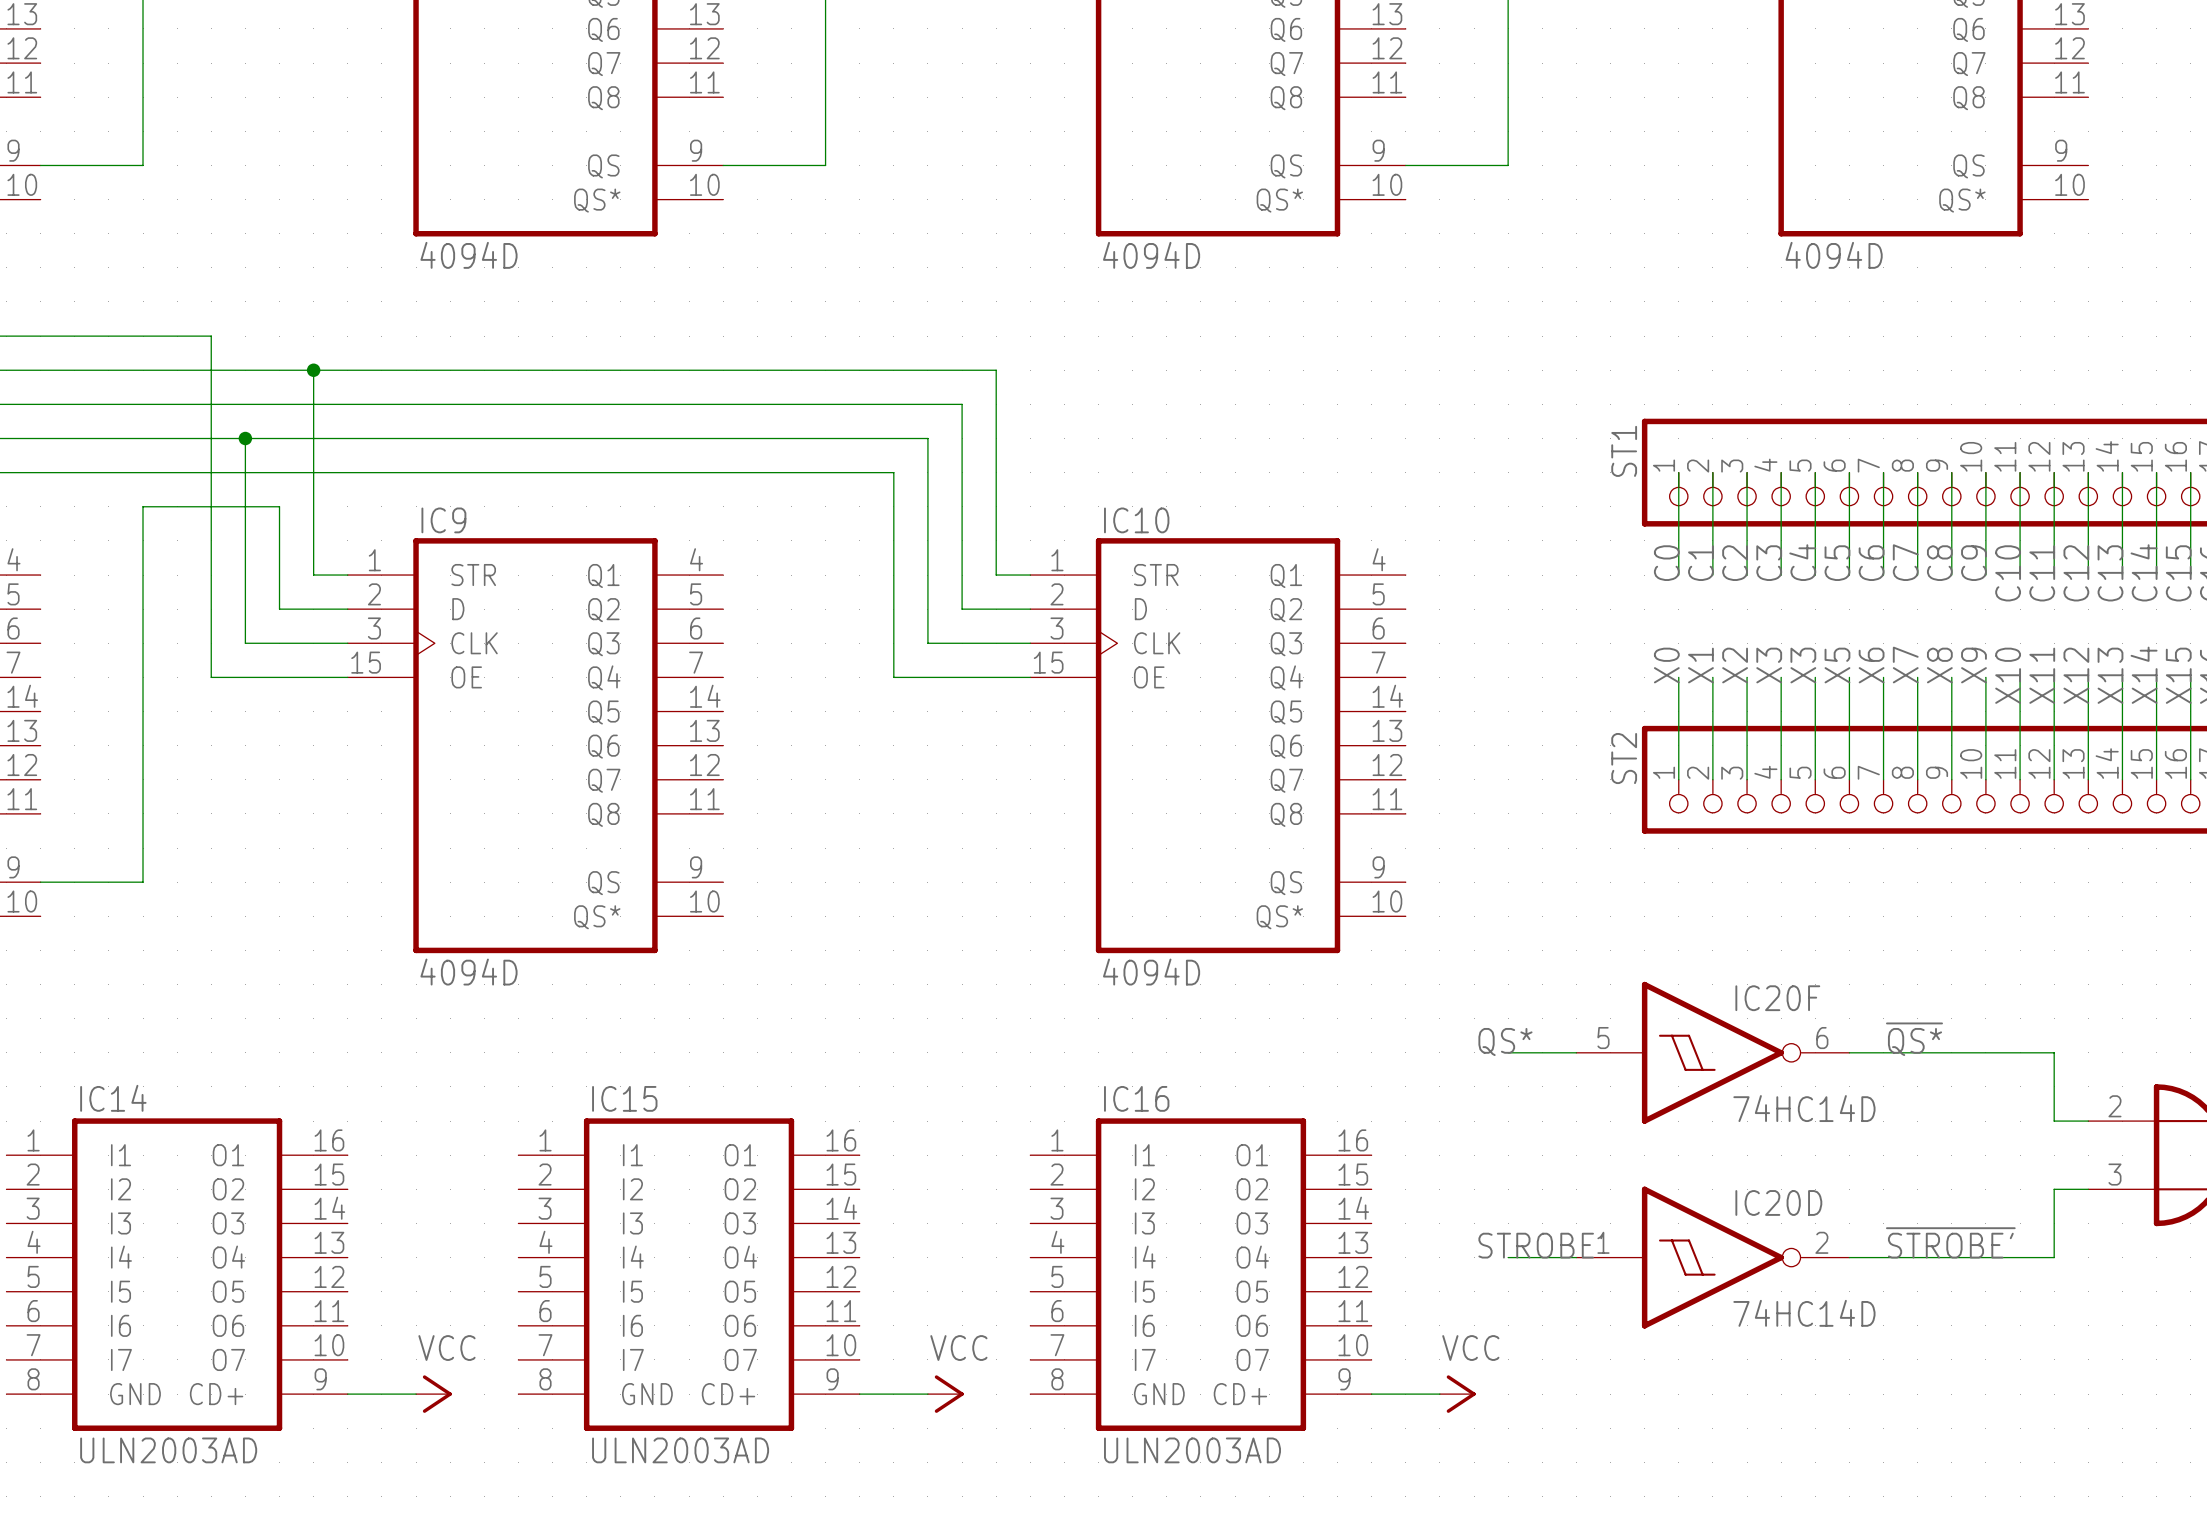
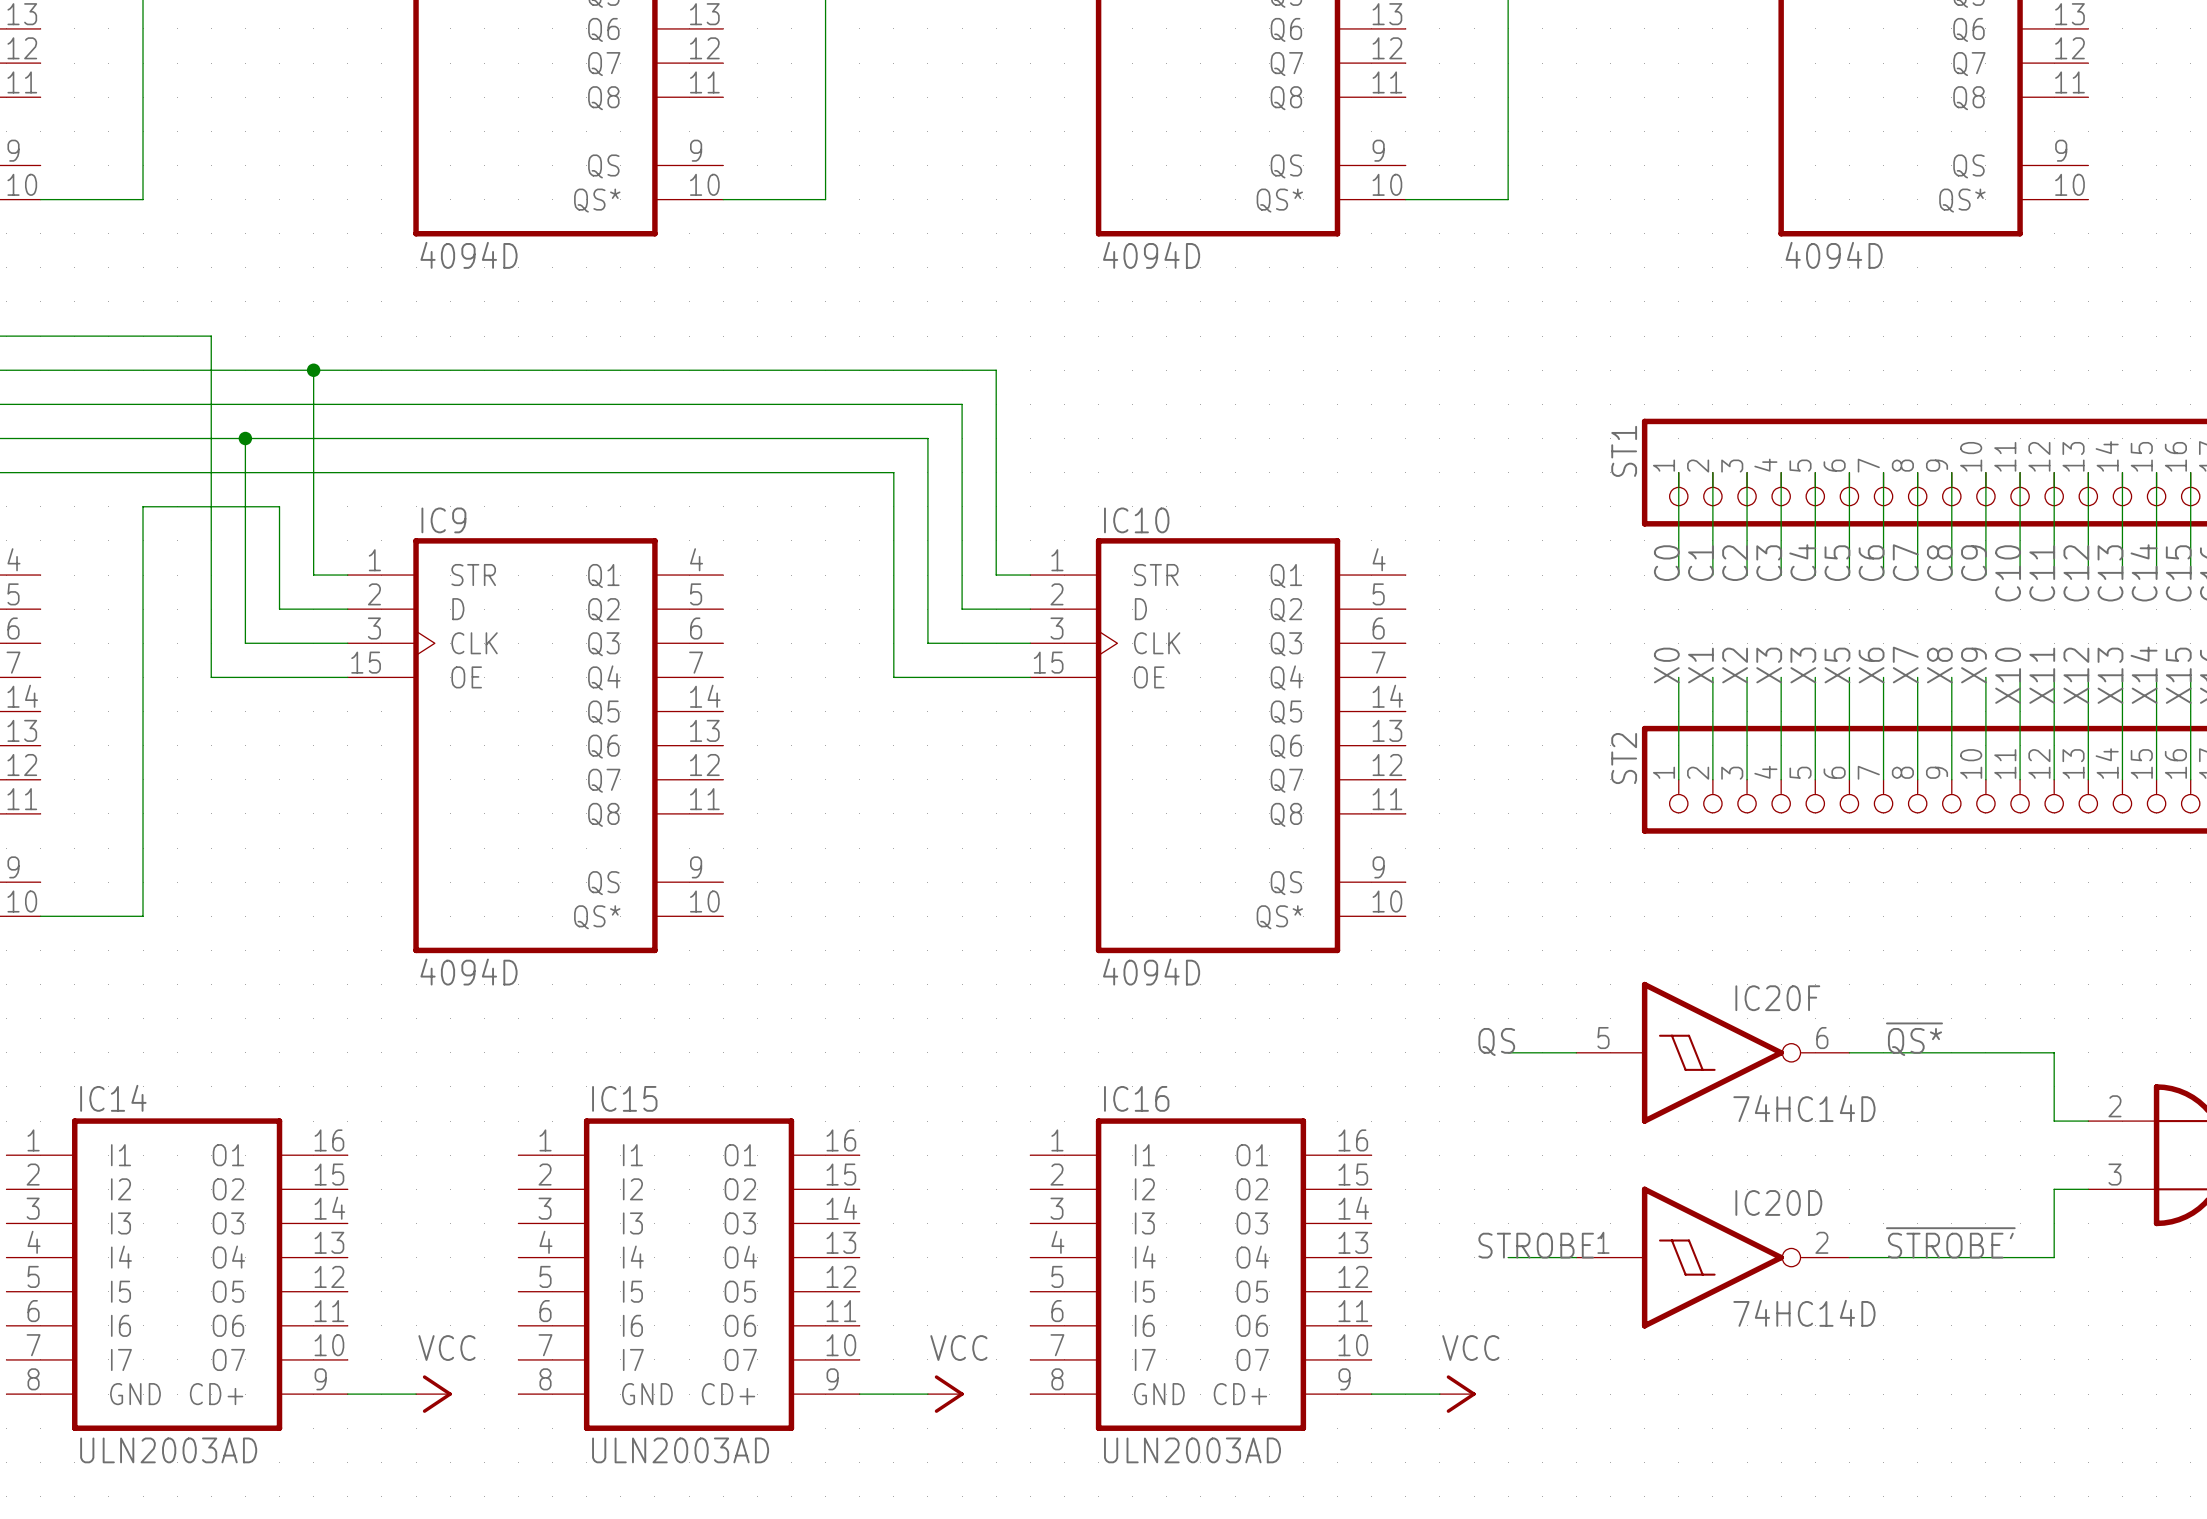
wire: (40, 165) (143, 165) -> (40, 199) (143, 199) (143, 165)
wire: (723, 165) (825, 165) -> (723, 199) (825, 199) (825, 165)
wire: (1405, 165) (1508, 165) -> (1405, 199) (1508, 199) (1508, 165)
wire: (40, 882) (143, 882) -> (40, 916) (143, 916) (143, 882)
label: QS* (1505, 1042) -> QS (1496, 1042)

